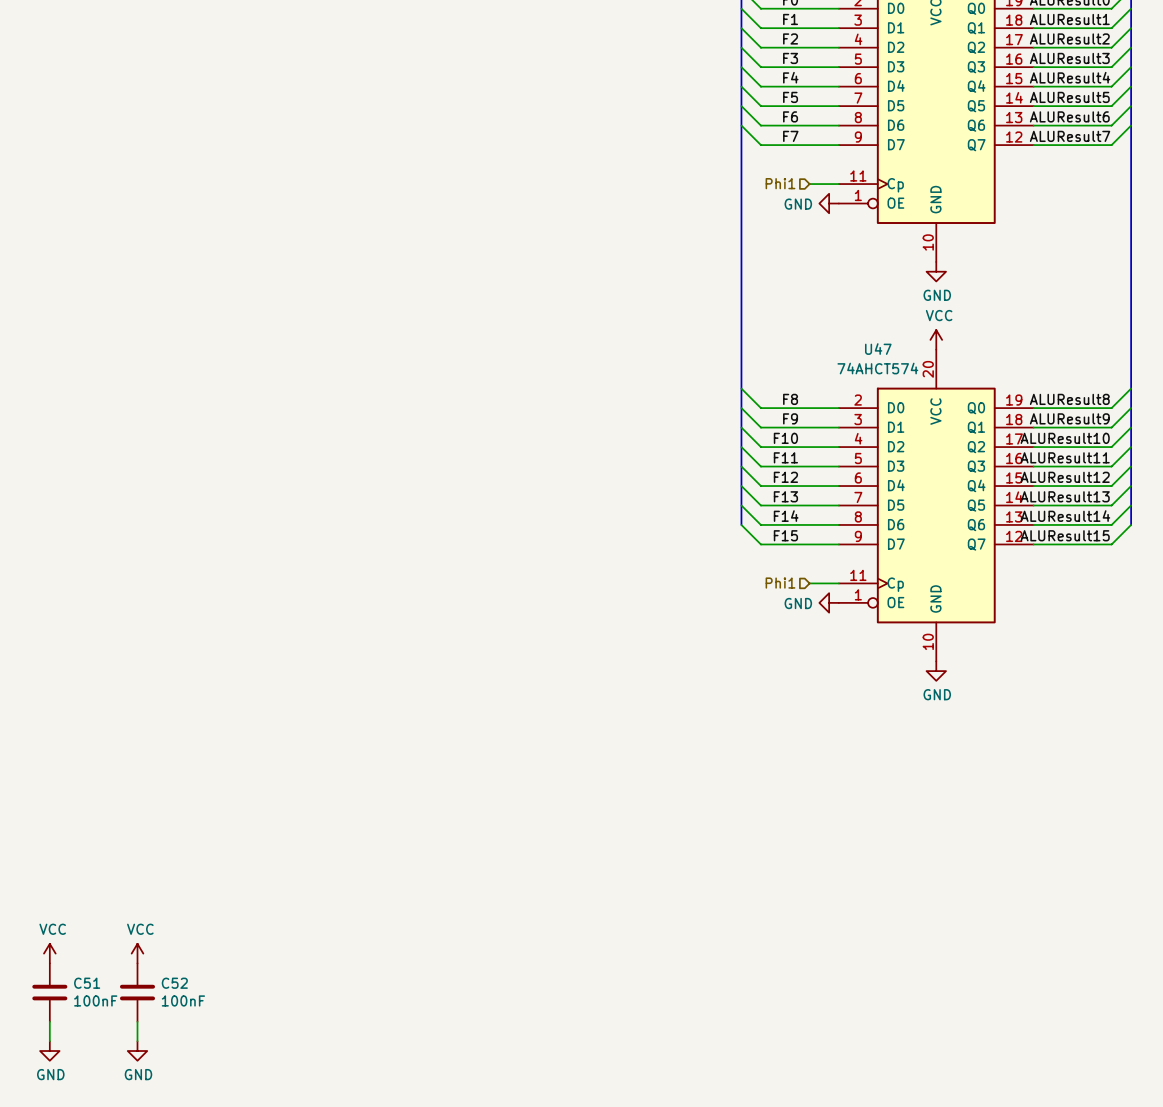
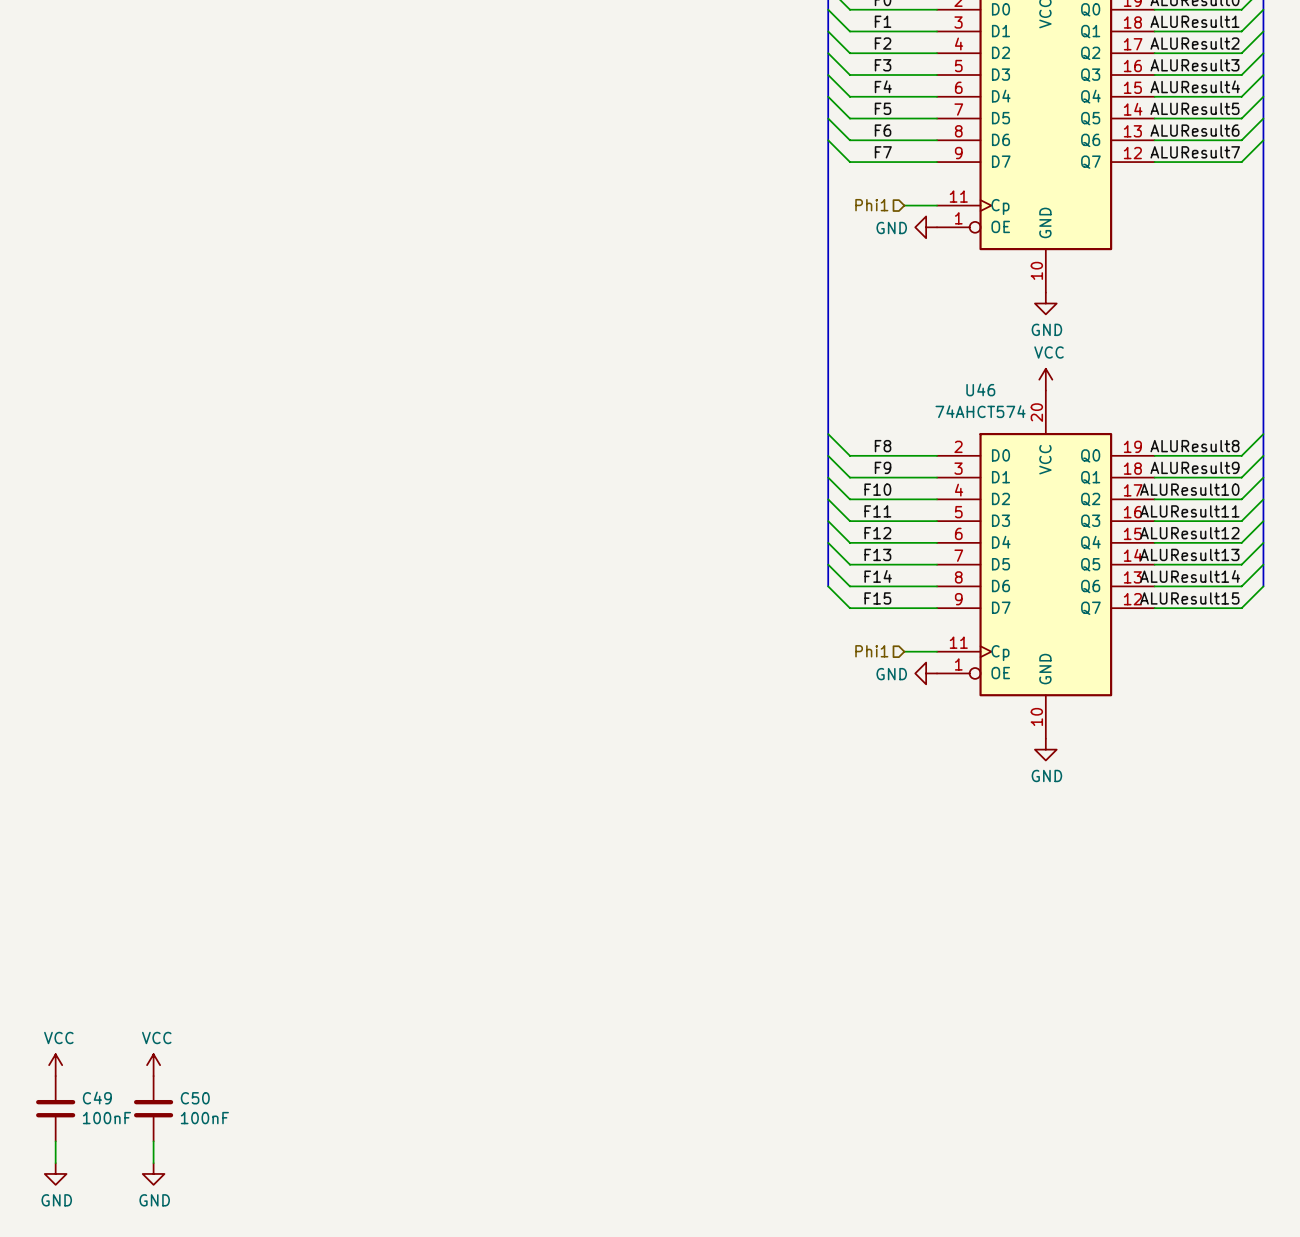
U47 name: U47 (878, 349) -> U46 (980, 389)
C51 name: C51 (87, 983) -> C49 (97, 1098)
C52 name: C52 (174, 983) -> C50 (195, 1098)

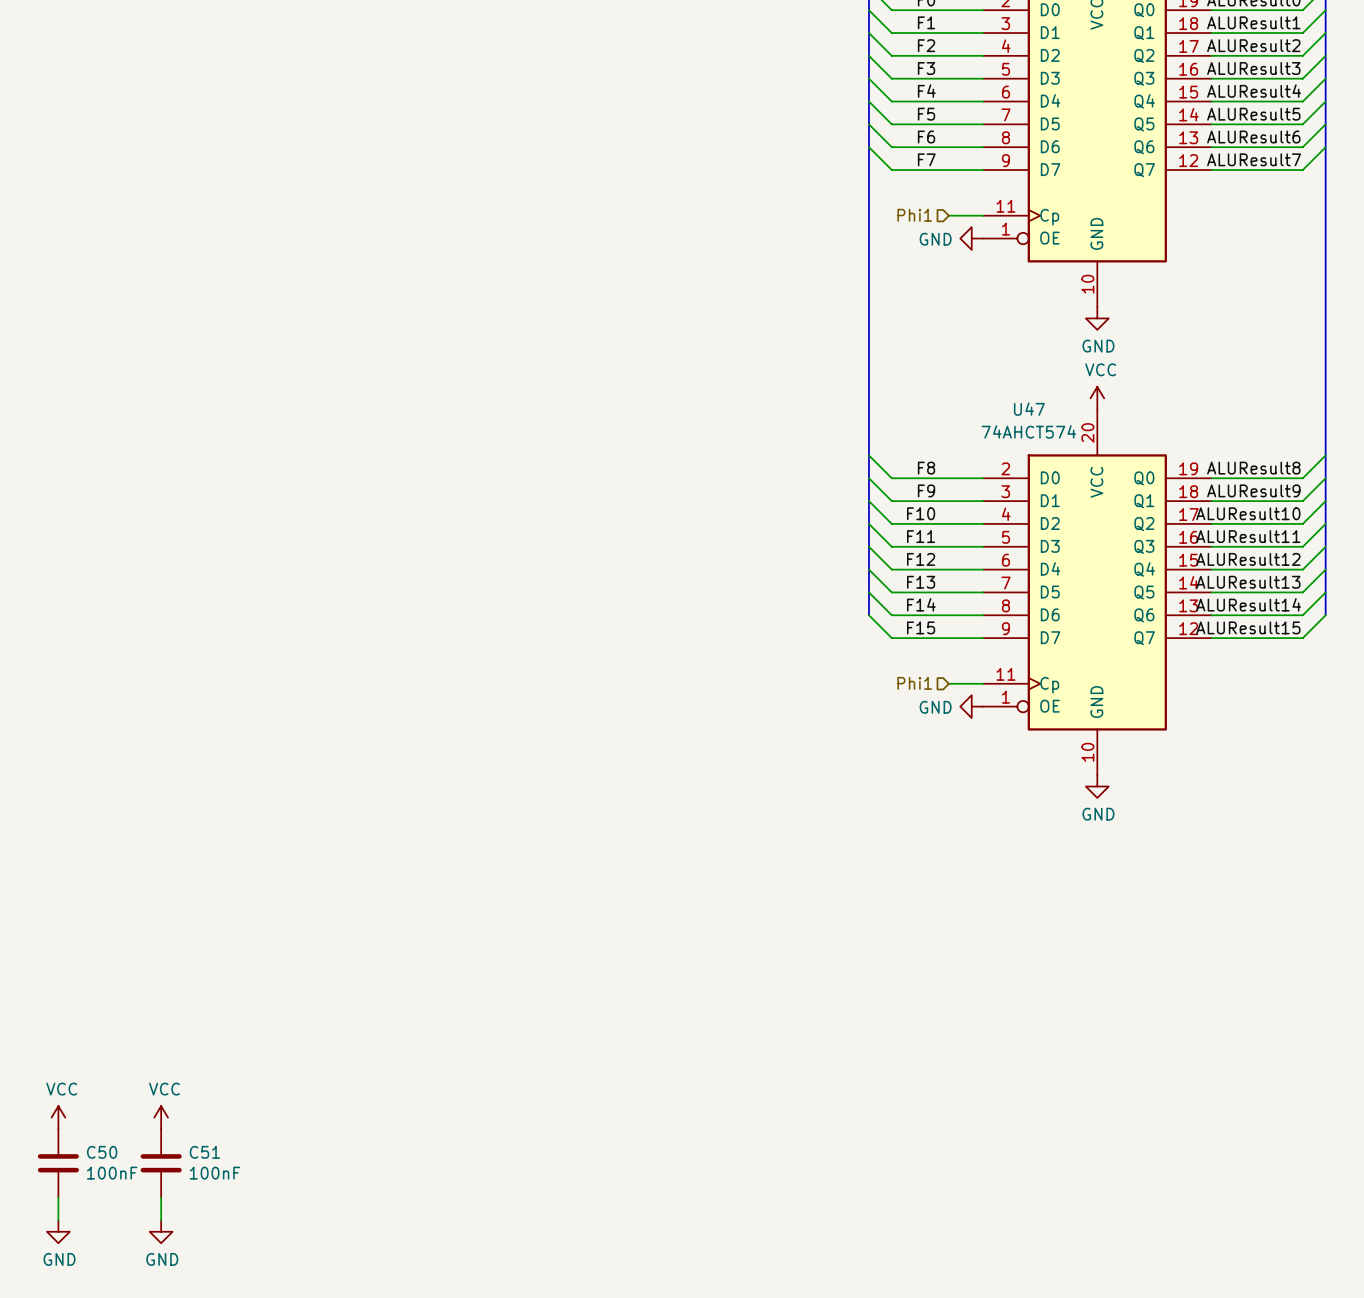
U46 name: U46 (980, 389) -> U47 (1029, 409)
C49 name: C49 (97, 1098) -> C50 (102, 1152)
C50 name: C50 (195, 1098) -> C51 (204, 1152)

